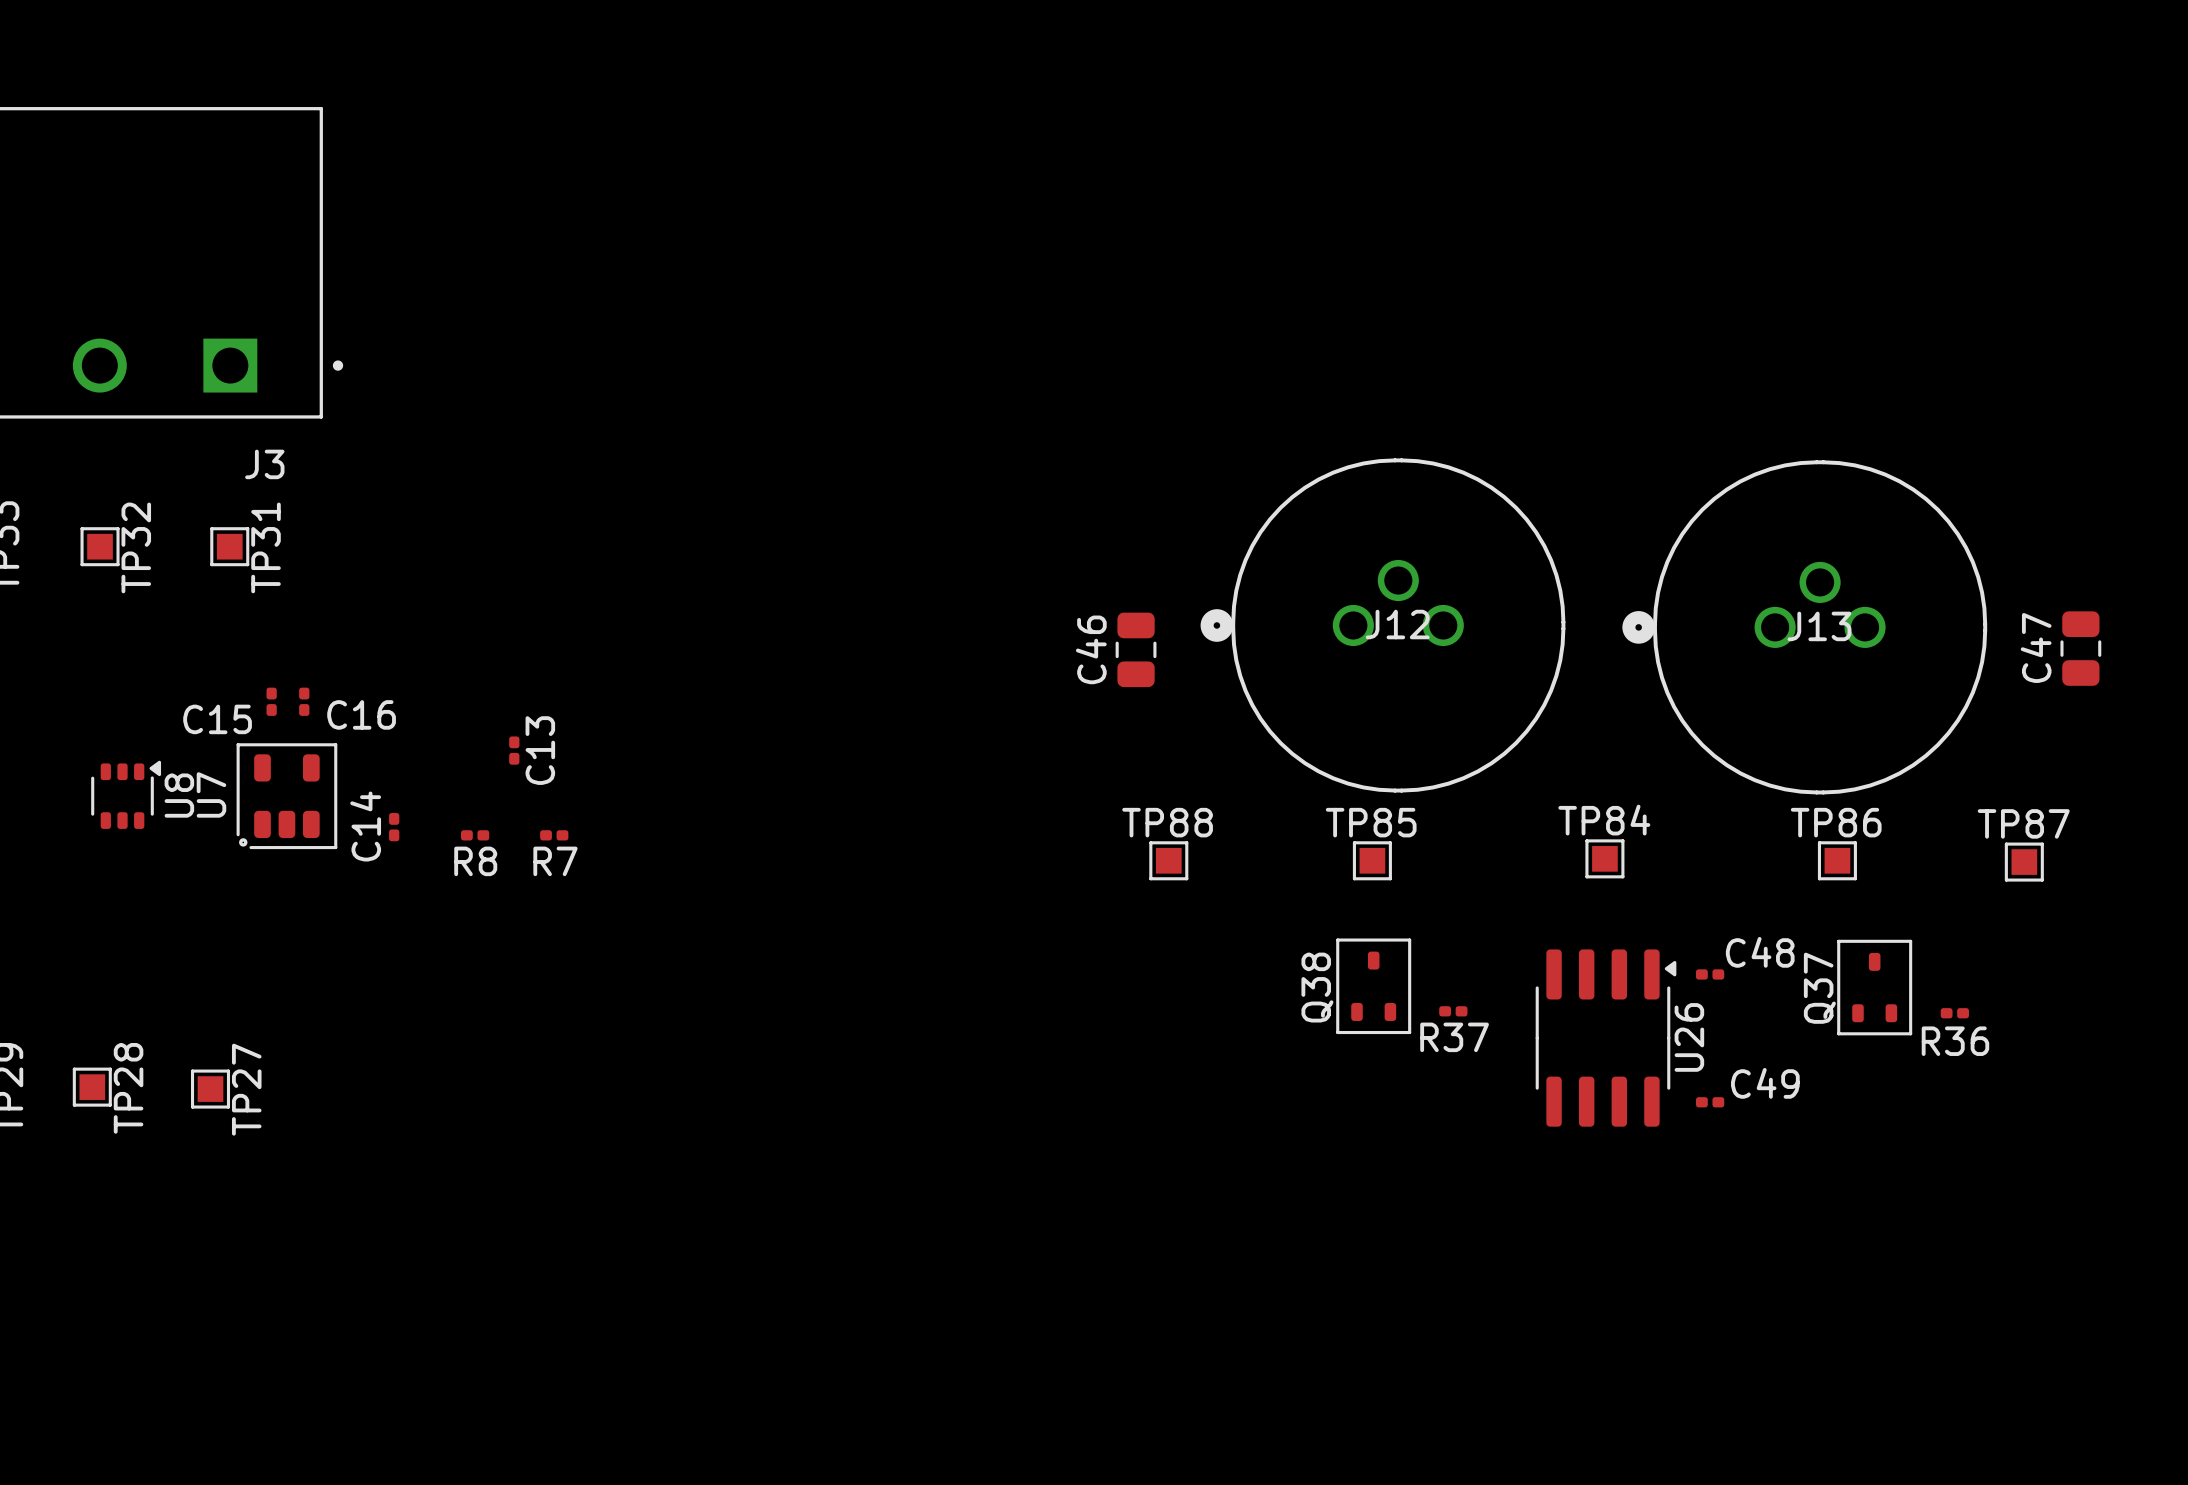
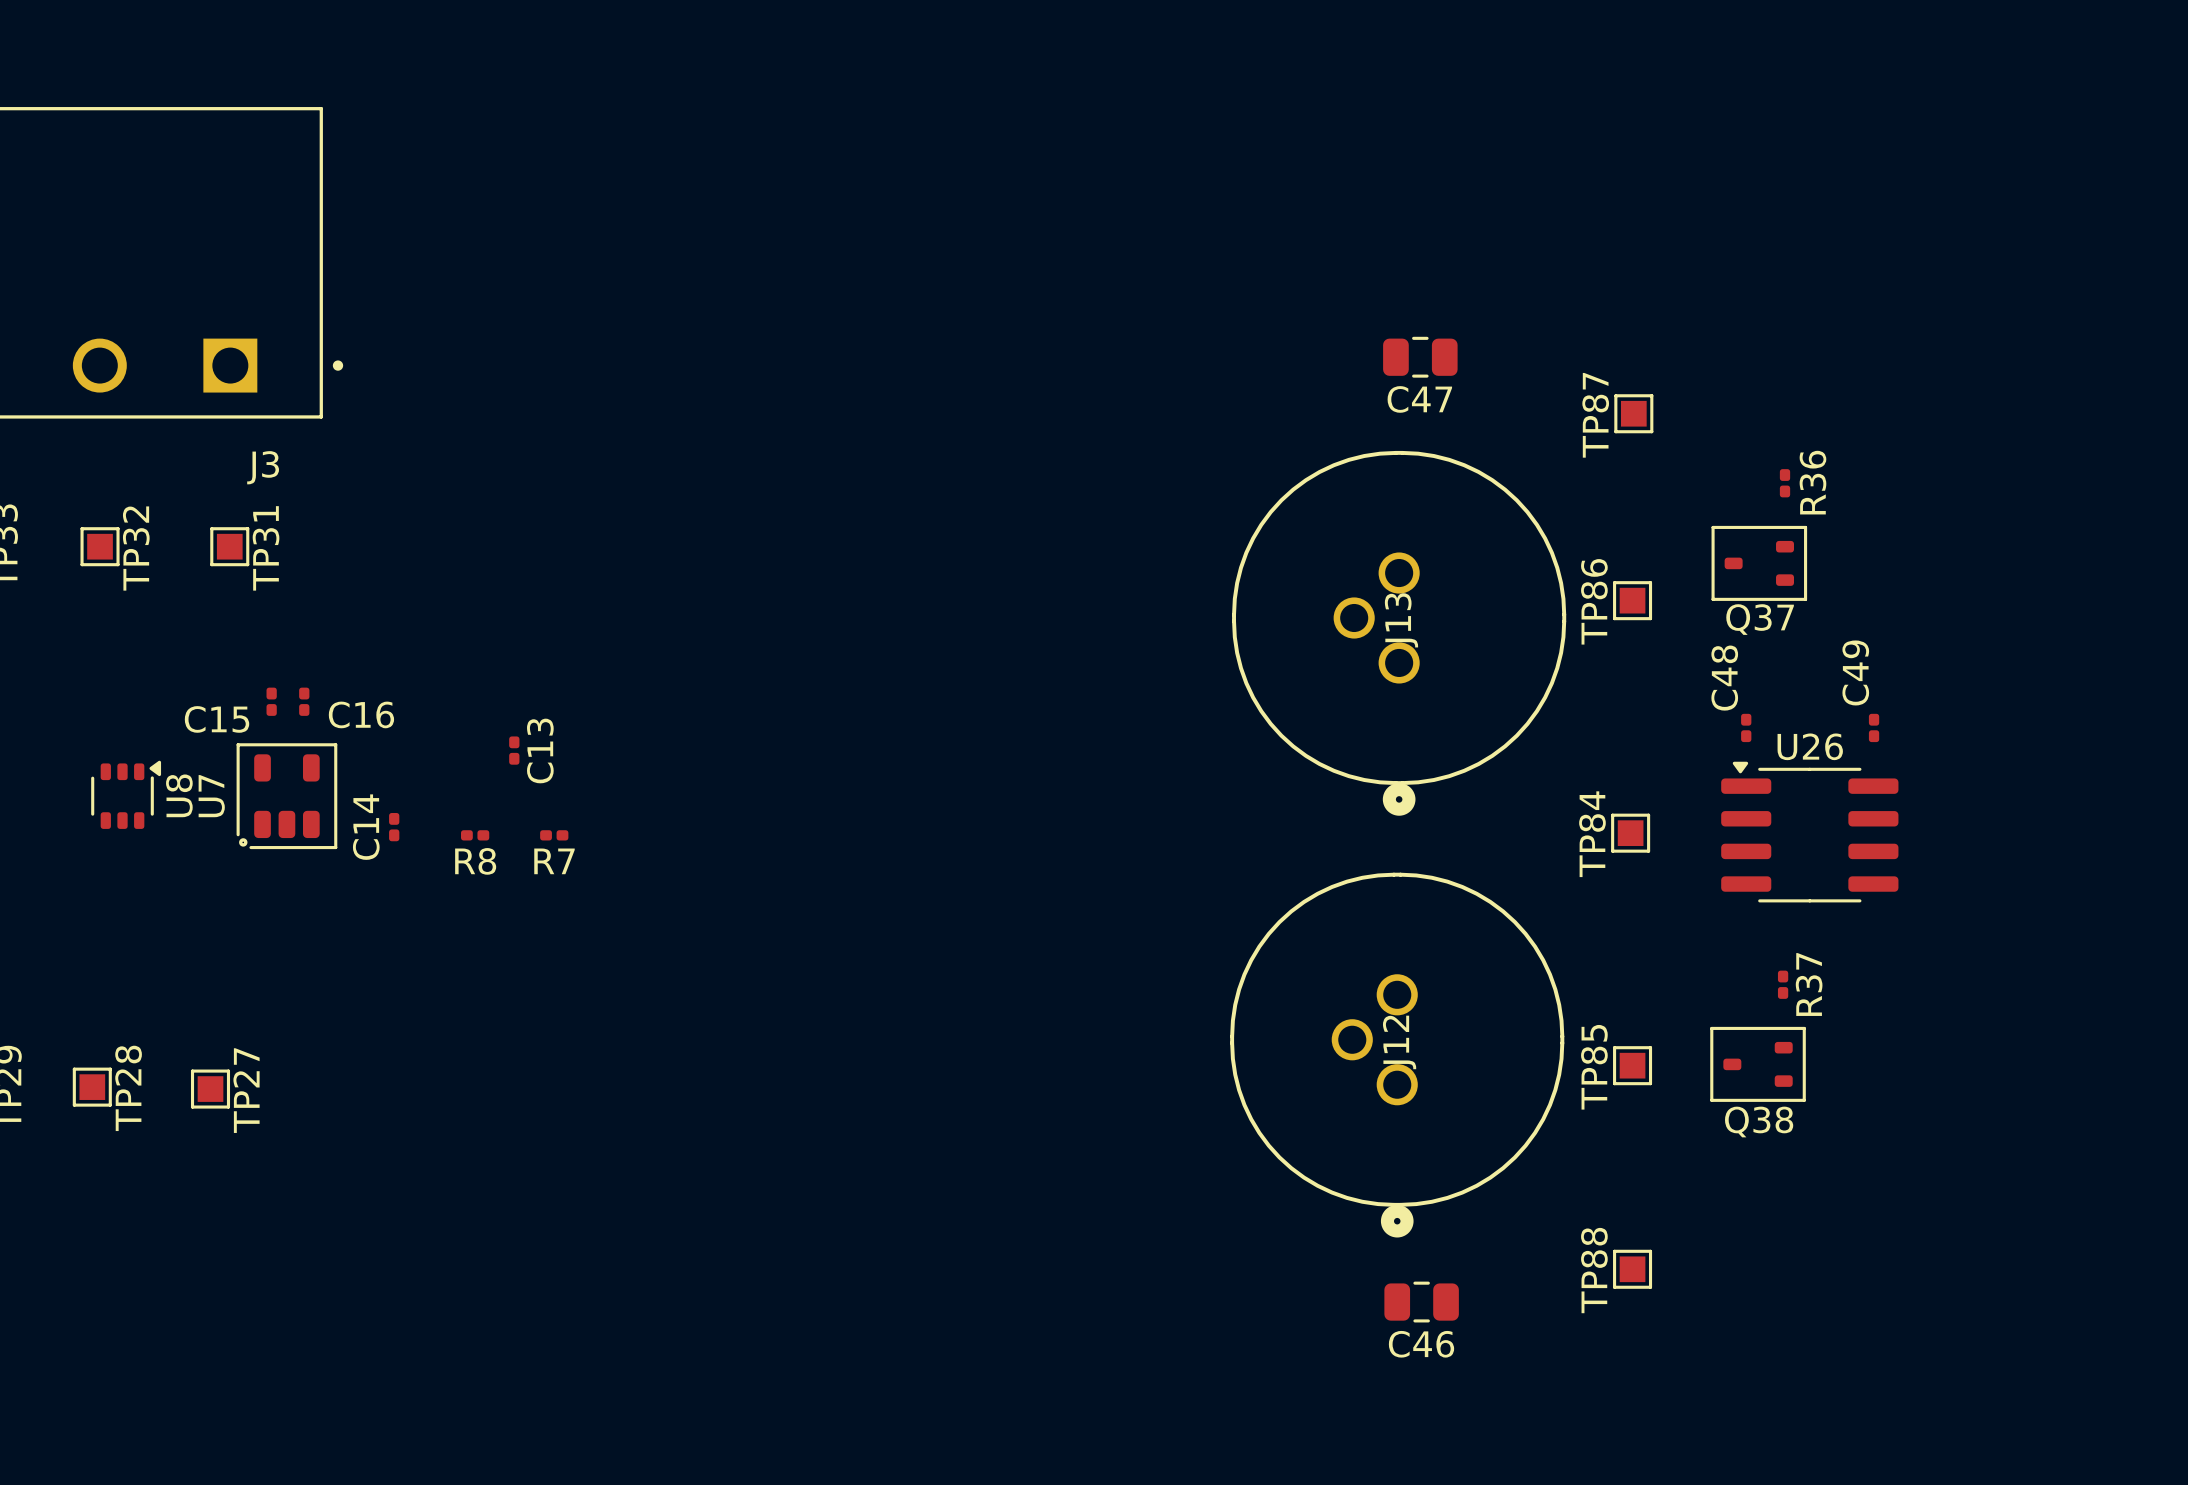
J12 rotation: 0° (1382, 625) -> 90° counterclockwise (1397, 1055)
J12 position: (1382, 625) -> (1397, 1055)
J13 rotation: 0° (1804, 627) -> 90° counterclockwise (1399, 633)
J13 position: (1804, 627) -> (1399, 633)
C47 name position: C47 (2036, 647) -> C47 (1419, 399)
C47 rotation: 0° (2080, 648) -> 90° clockwise (1420, 357)
C47 position: (2080, 648) -> (1420, 357)
C46 name position: C46 (1091, 649) -> C46 (1421, 1344)
C46 rotation: 0° (1136, 649) -> 90° clockwise (1421, 1302)
C46 position: (1136, 649) -> (1421, 1302)
TP84 name rotation: 0° (1604, 820) -> 90° counterclockwise (1592, 834)
TP88 name rotation: 0° (1167, 822) -> 90° counterclockwise (1594, 1270)
TP85 name rotation: 0° (1371, 822) -> 90° counterclockwise (1594, 1067)
TP86 name rotation: 0° (1836, 822) -> 90° counterclockwise (1594, 601)
TP87 name rotation: 0° (2023, 823) -> 90° counterclockwise (1595, 415)
TP84 position: (1604, 858) -> (1630, 833)
TP88 position: (1168, 860) -> (1632, 1269)
TP85 position: (1372, 860) -> (1632, 1065)
TP86 position: (1837, 860) -> (1632, 600)
TP87 position: (2024, 862) -> (1633, 413)
C48 name position: C48 (1760, 952) -> C48 (1724, 678)
C48 rotation: 0° (1710, 974) -> 90° clockwise (1746, 727)
C48 position: (1710, 974) -> (1746, 727)
Q38 rotation: 0° (1373, 986) -> 90° counterclockwise (1758, 1064)
Q38 position: (1373, 986) -> (1758, 1064)
Q37 rotation: 0° (1874, 987) -> 90° counterclockwise (1759, 563)
Q37 position: (1874, 987) -> (1759, 563)
R37 rotation: 0° (1453, 1011) -> 90° clockwise (1783, 984)
R37 position: (1453, 1011) -> (1783, 984)
R36 rotation: 0° (1954, 1013) -> 90° clockwise (1785, 483)
R36 position: (1954, 1013) -> (1785, 483)
U26 rotation: 0° (1606, 1038) -> 90° counterclockwise (1809, 832)
U26 position: (1606, 1038) -> (1809, 832)
C49 name position: C49 (1765, 1083) -> C49 (1855, 672)
C49 rotation: 0° (1710, 1102) -> 90° clockwise (1874, 727)
C49 position: (1710, 1102) -> (1874, 727)

